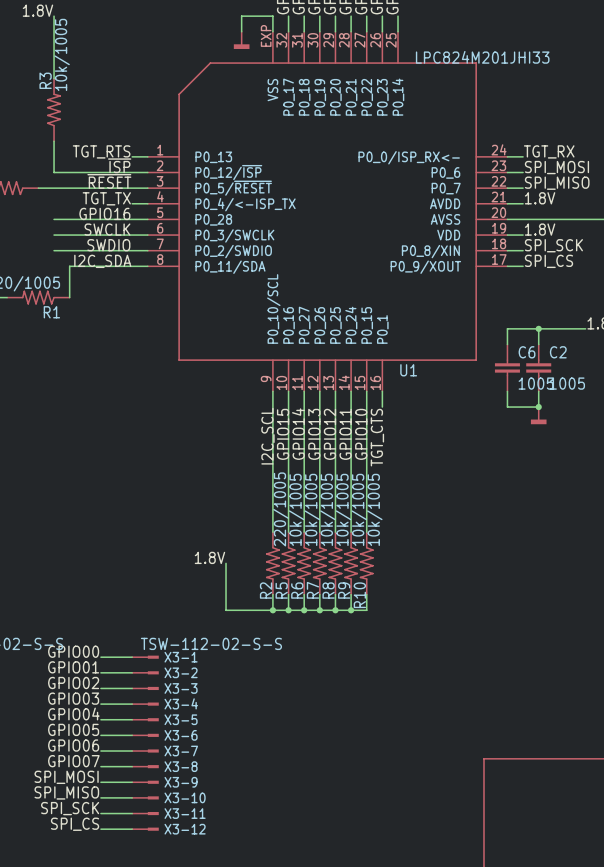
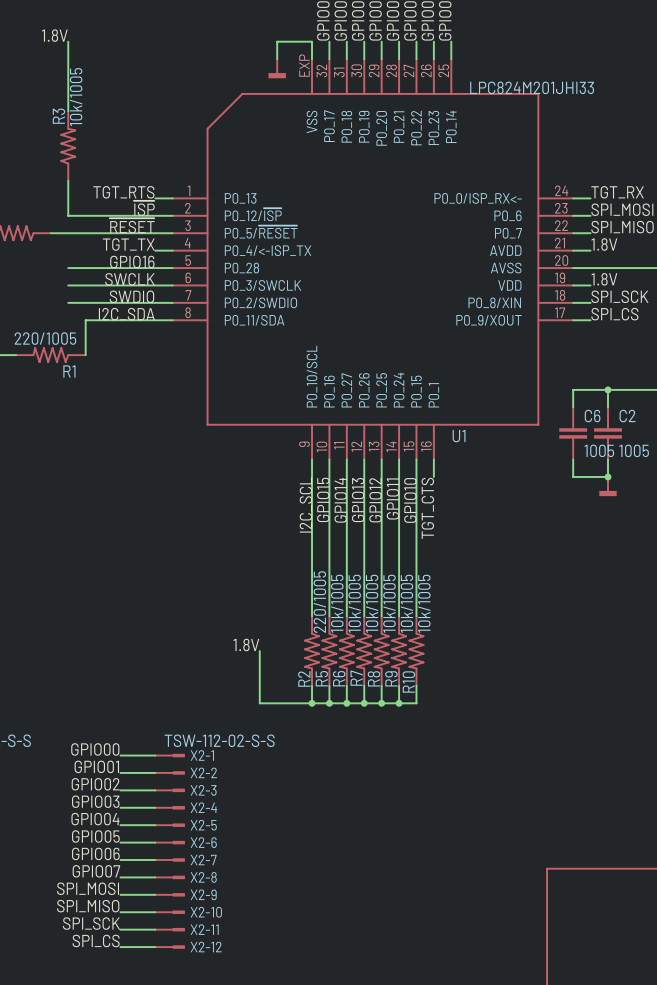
X3-1 name: X3-1 (181, 657) -> X2-1 (202, 755)
X3-2 name: X3-2 (181, 672) -> X2-2 (203, 772)
X3-3 name: X3-3 (181, 688) -> X2-3 (203, 790)
X3-4 name: X3-4 (181, 703) -> X2-4 (203, 807)
X3-5 name: X3-5 (181, 719) -> X2-5 (203, 825)
X3-6 name: X3-6 (181, 735) -> X2-6 (203, 842)
X3-7 name: X3-7 (181, 751) -> X2-7 (203, 859)
X3-8 name: X3-8 (181, 766) -> X2-8 (203, 877)
X3-9 name: X3-9 (181, 782) -> X2-9 (203, 894)
X3-10 name: X3-10 (185, 797) -> X2-10 (206, 912)
X3-11 name: X3-11 (185, 813) -> X2-11 (204, 929)
X3-12 name: X3-12 (185, 829) -> X2-12 (206, 947)

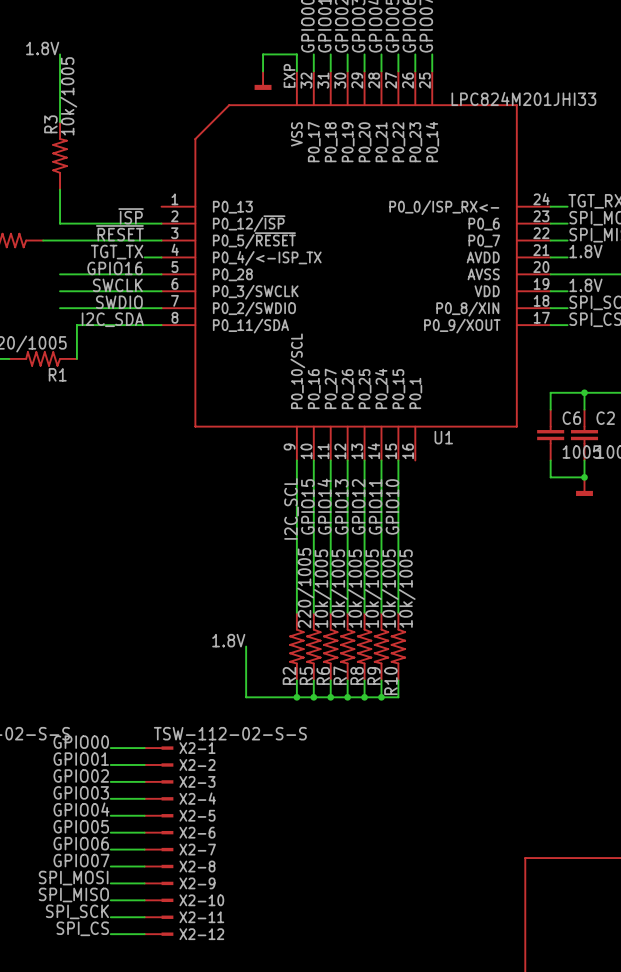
label: TGT_RTS (123, 192) -> none
wire: (155, 198) (172, 198) -> none
wire: (433, 459) (433, 476) -> none
label: TGT_CTS (427, 508) -> none

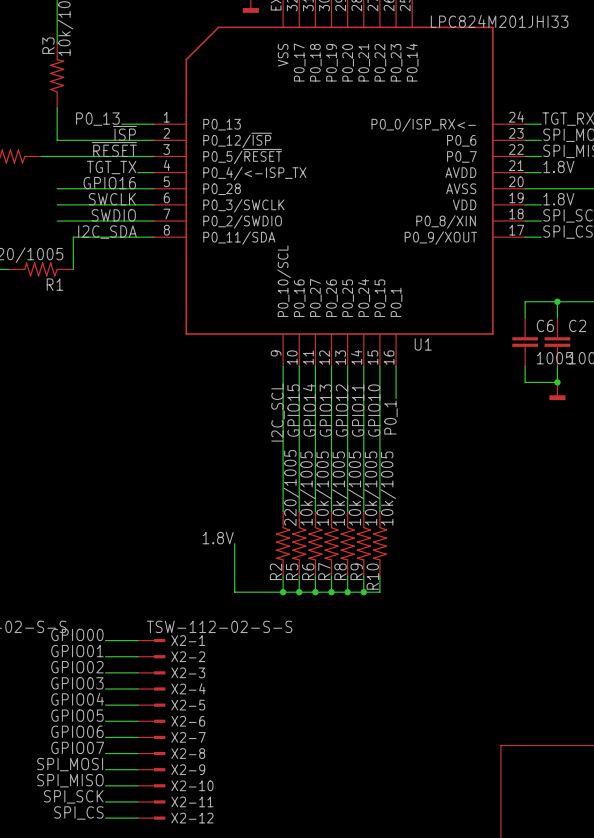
label: none -> P0_13 (97, 119)
wire: none -> (121, 124) (154, 124)
wire: none -> (396, 366) (396, 398)
label: none -> P0_1 (390, 417)

